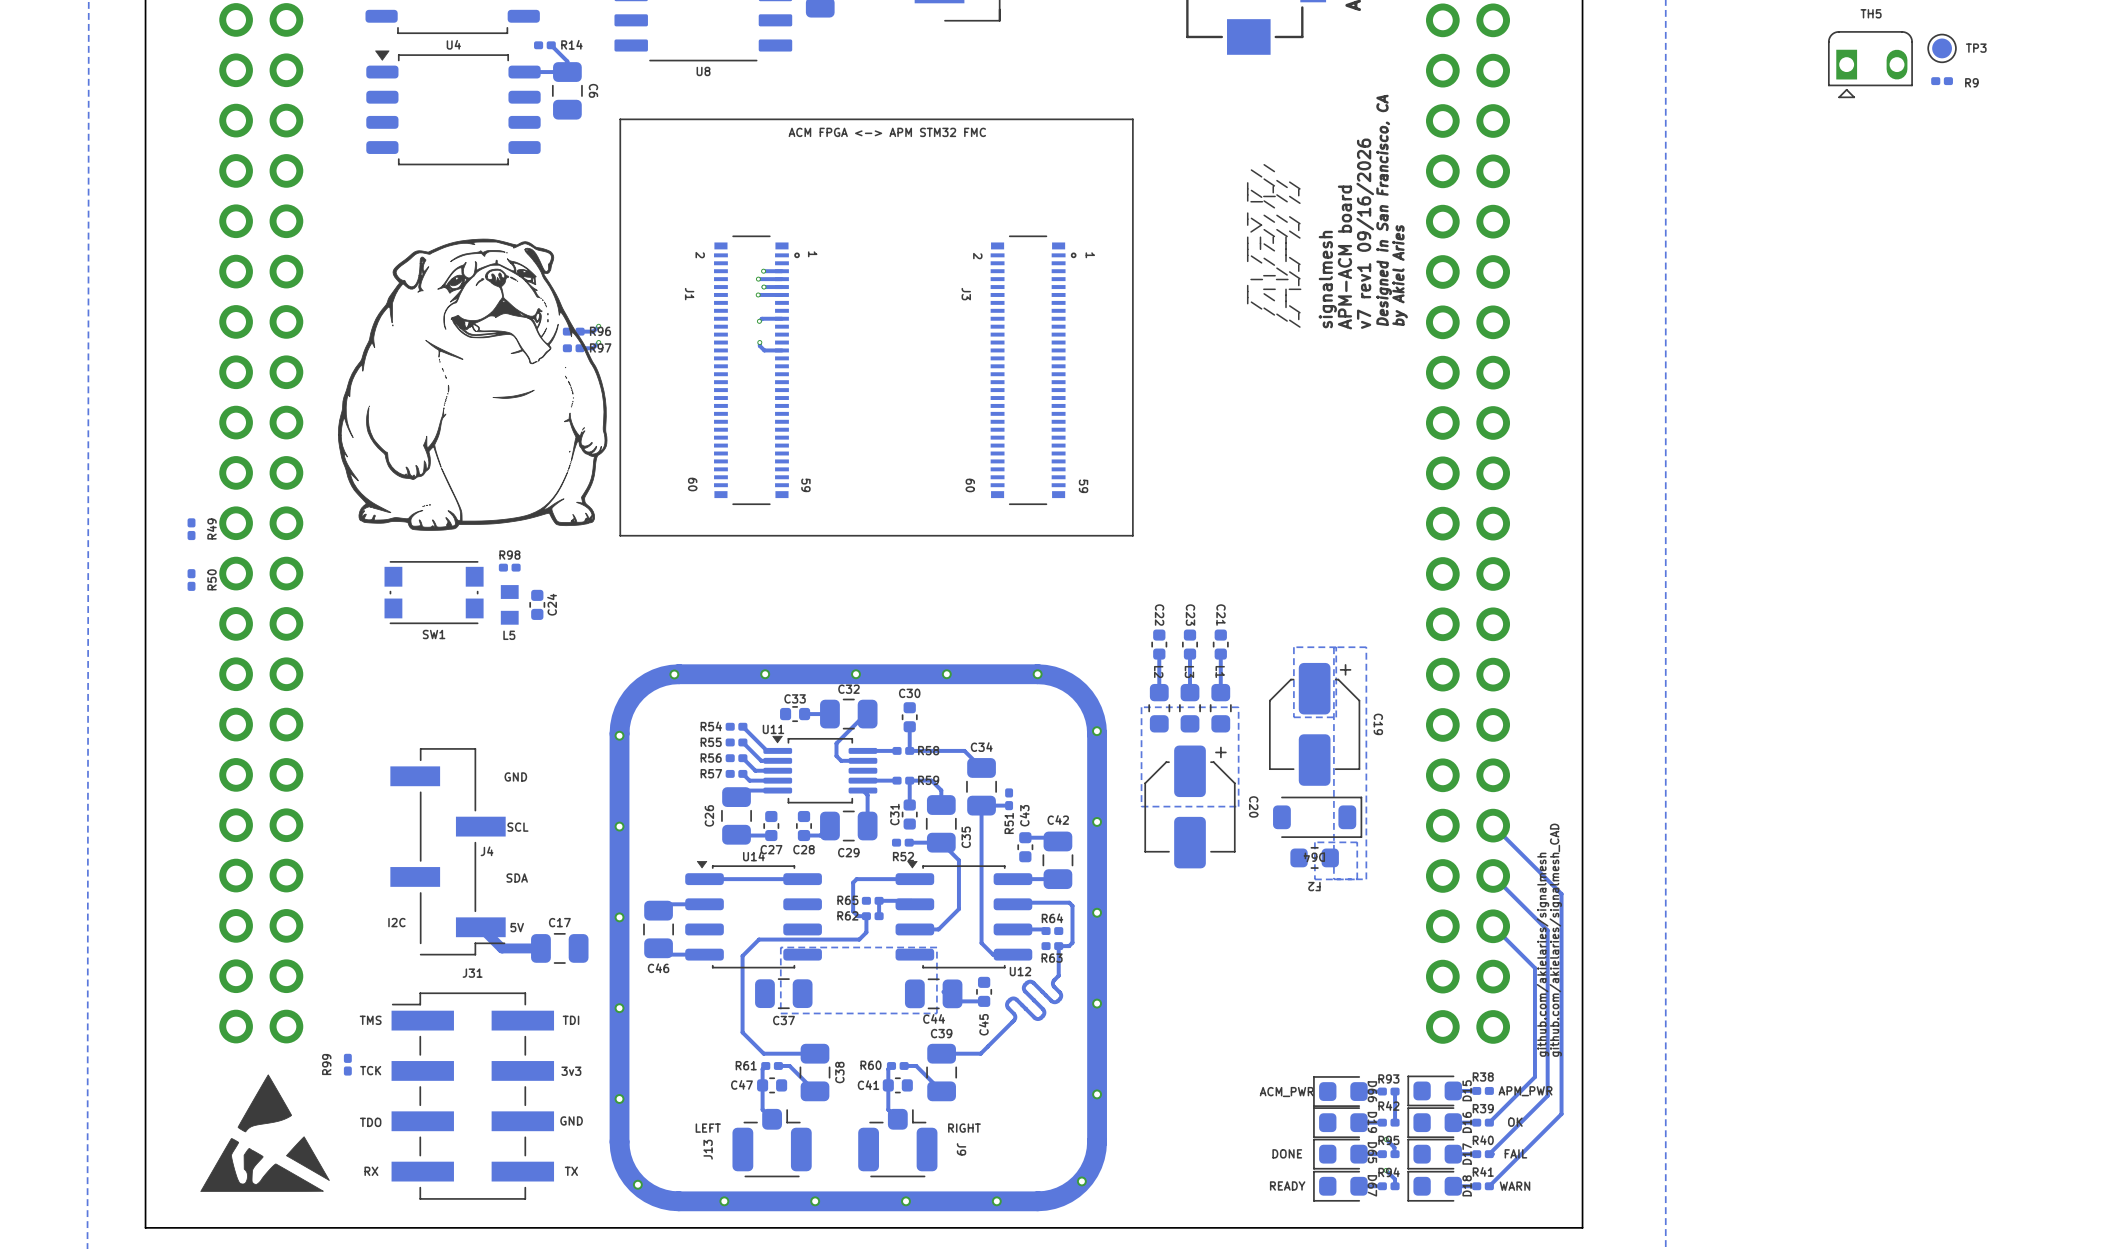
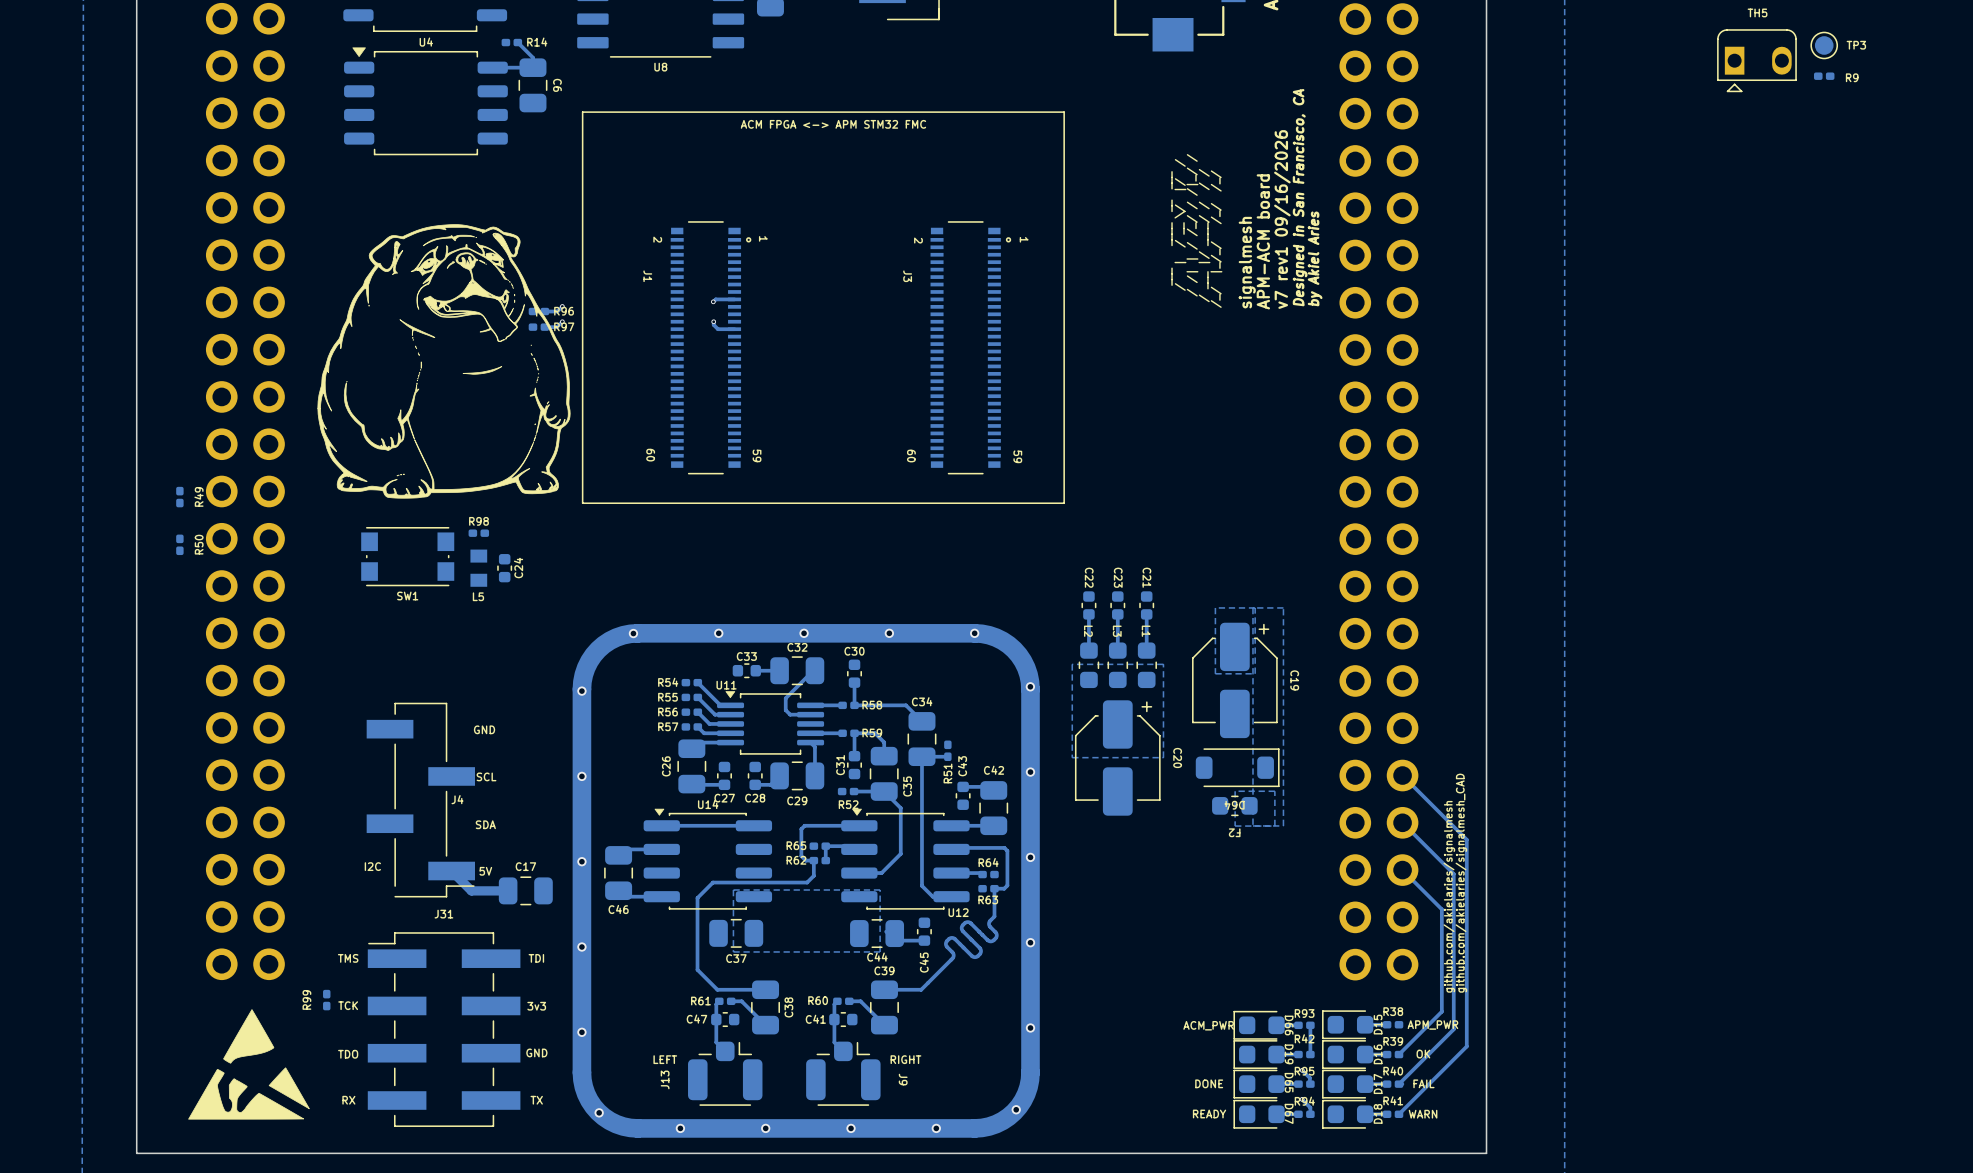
via: (763, 271) -> none
track: (781, 271) (763, 271) -> none
via: (758, 279) -> none
track: (781, 279) (758, 279) -> none
via: (763, 287) -> none
track: (781, 287) (763, 287) -> none
via: (758, 294) -> none
track: (781, 294) (758, 294) -> none

